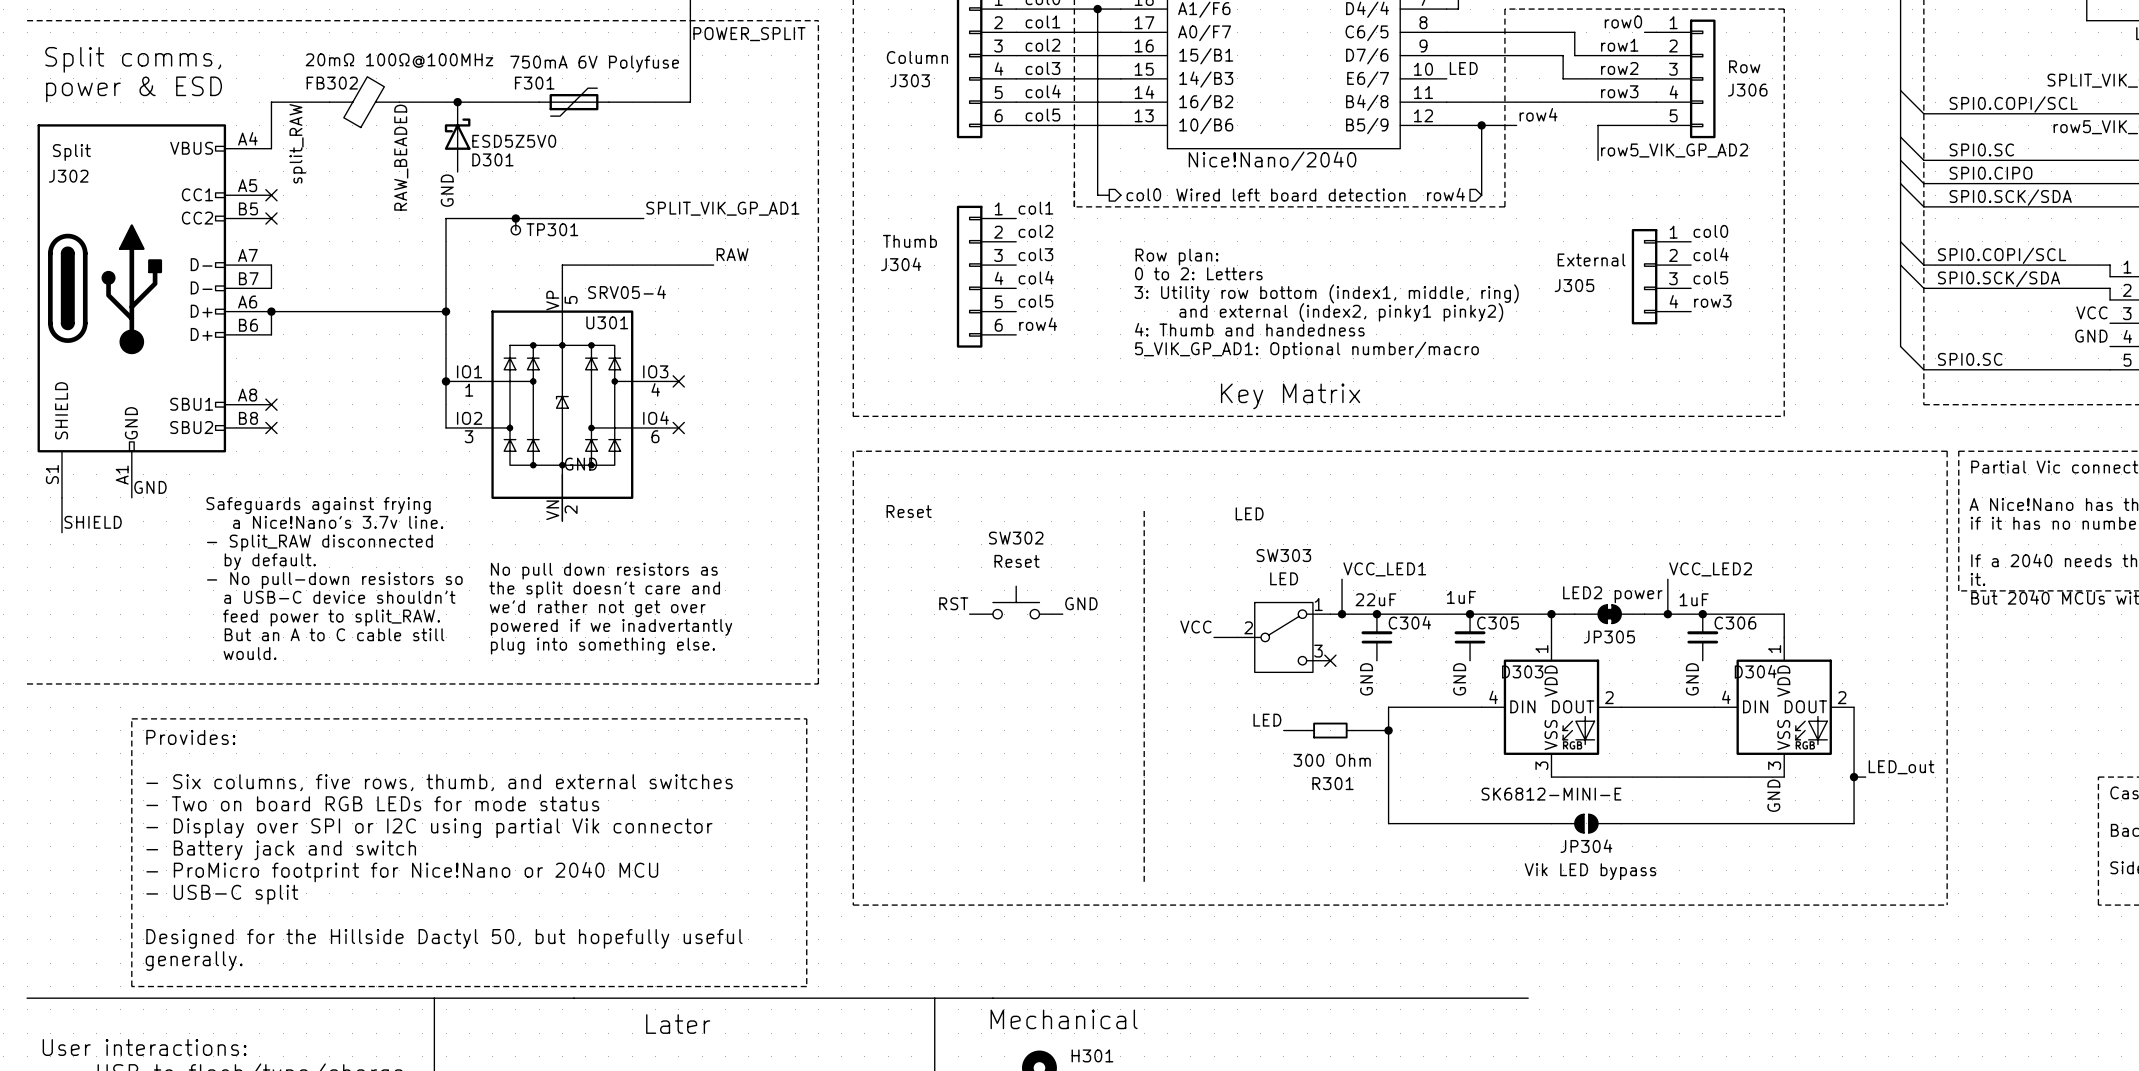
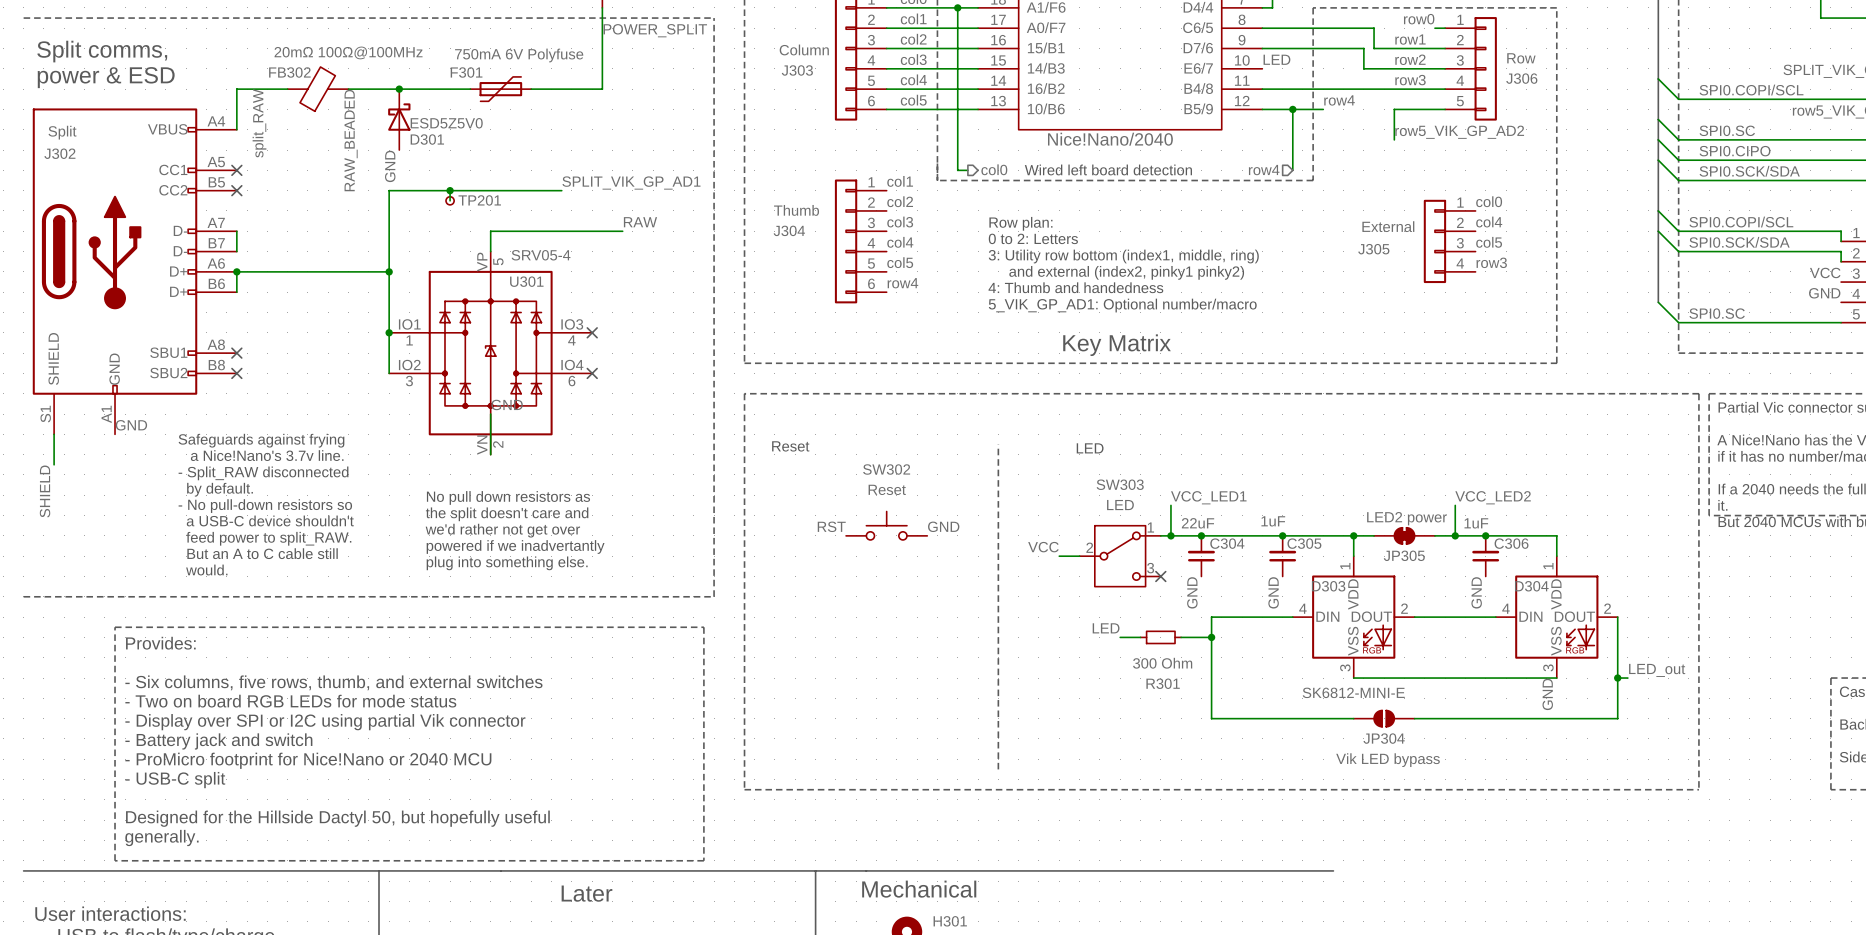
TP301 name: TP301 (552, 229) -> TP201 (479, 200)
label rotation: 0° (93, 522) -> 90° counterclockwise (45, 491)

